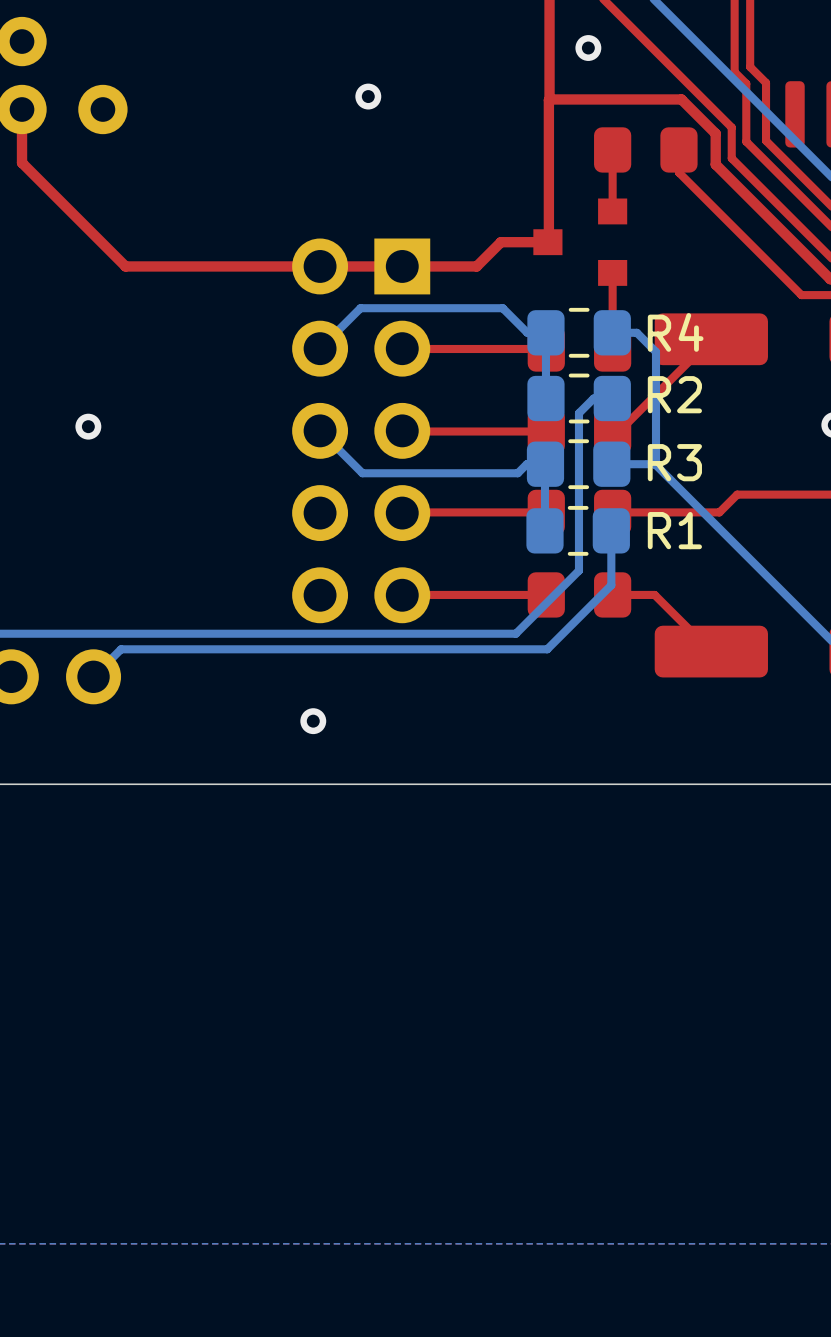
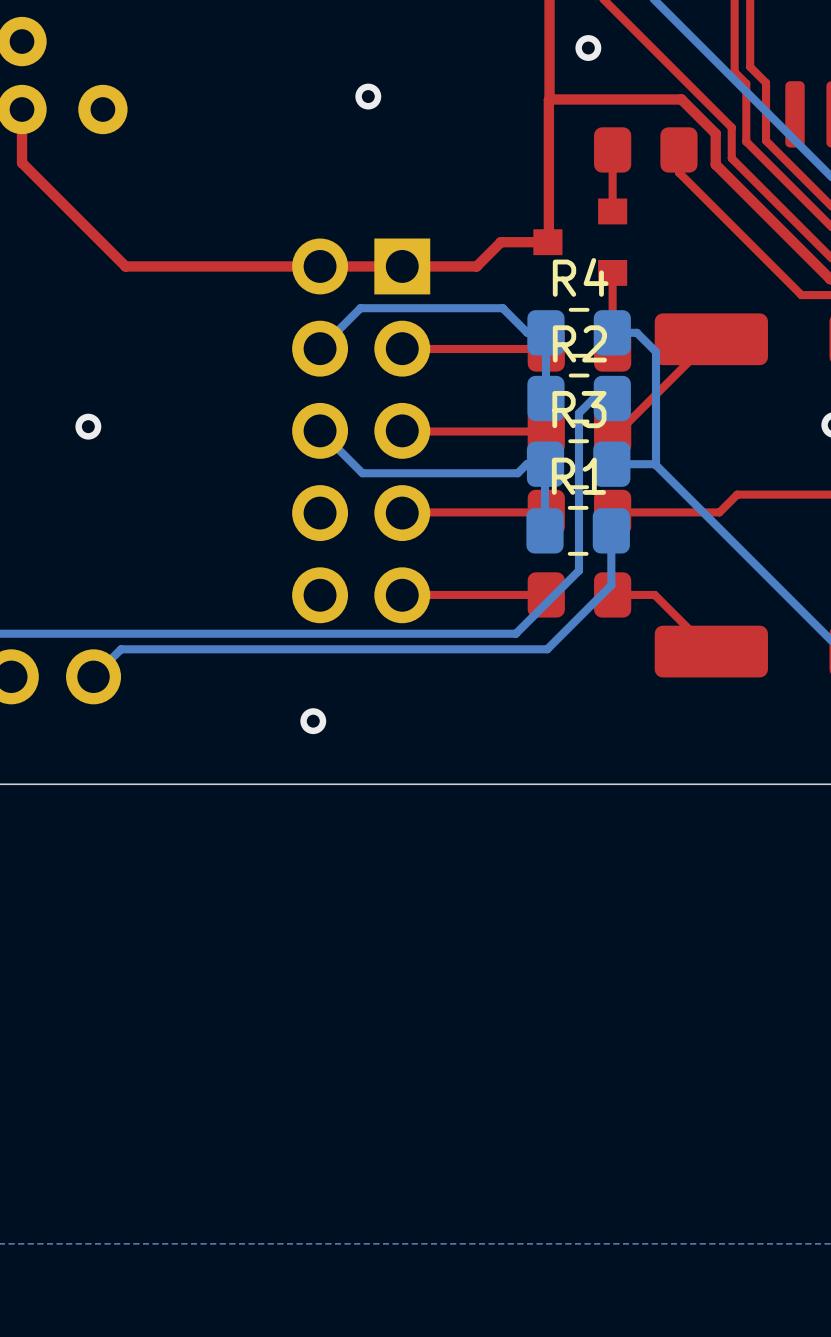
R4 name position: R4 (675, 332) -> R4 (580, 277)
R2 name position: R2 (674, 394) -> R2 (579, 343)
R3 name position: R3 (674, 462) -> R3 (579, 409)
R1 name position: R1 (674, 530) -> R1 (578, 476)

